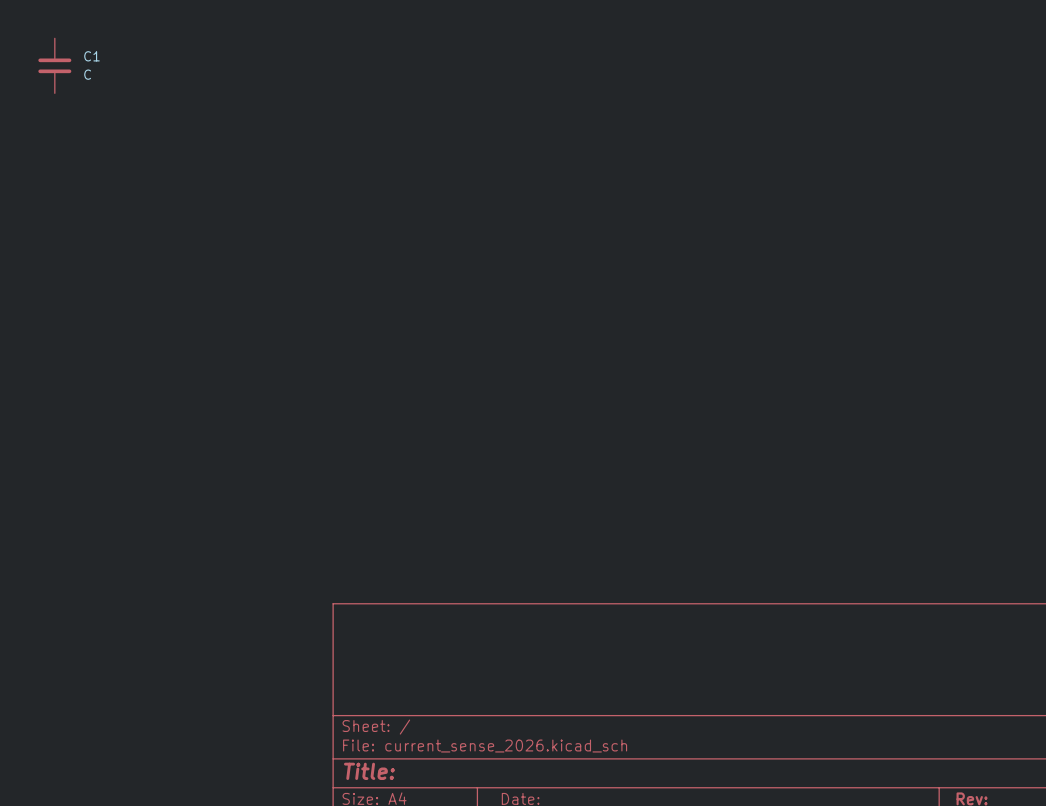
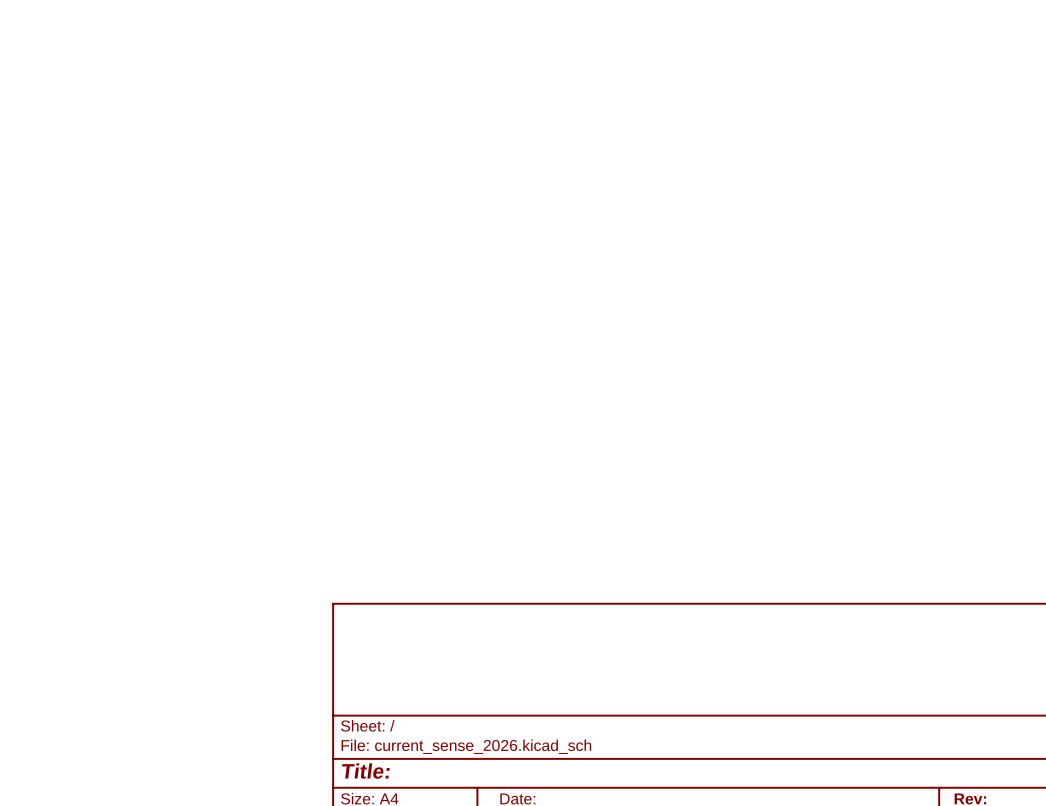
C1: C (54, 65) -> none

